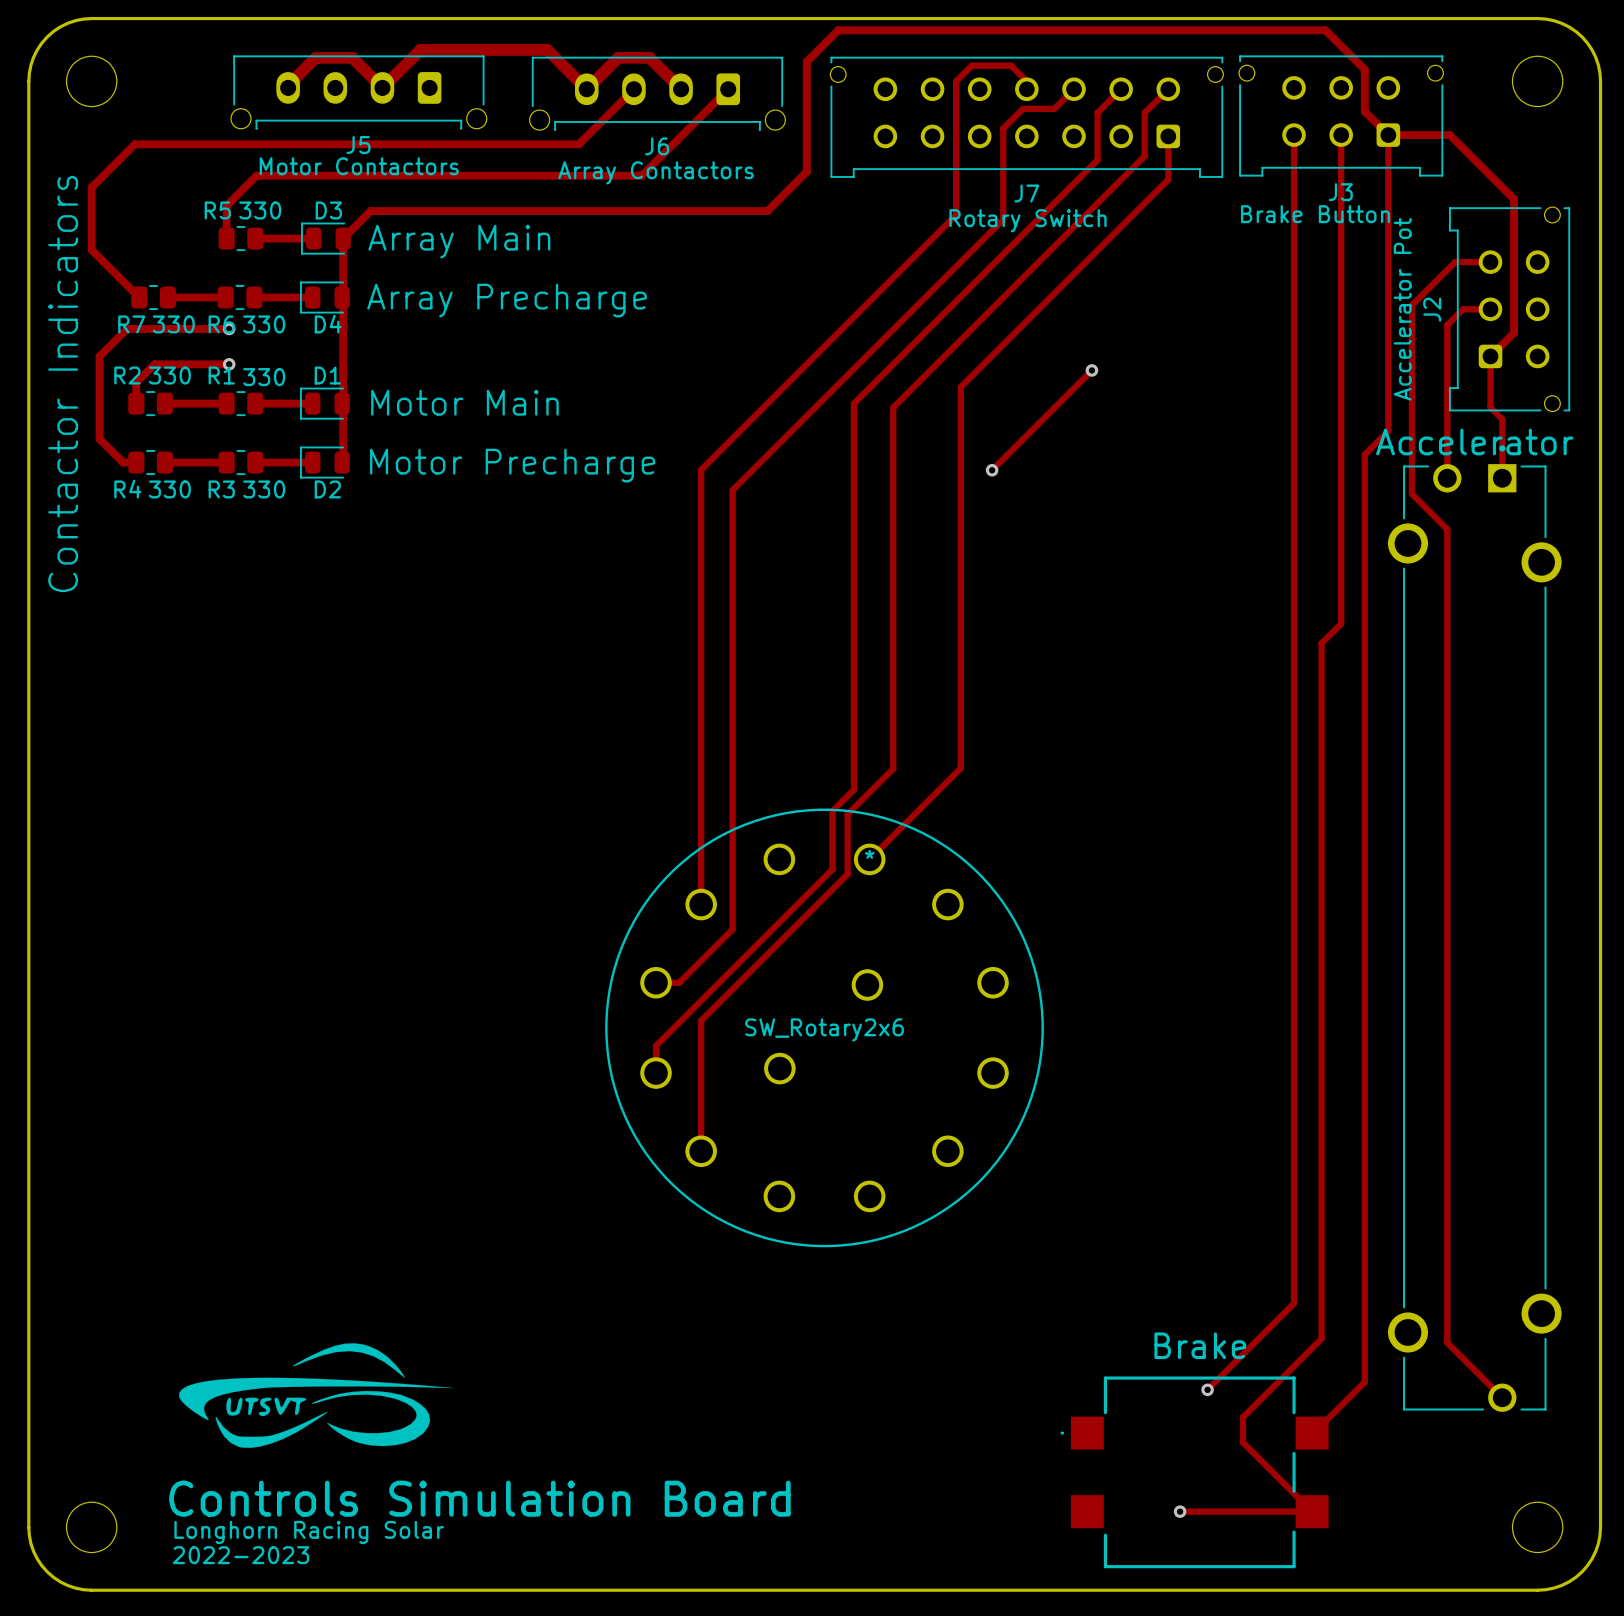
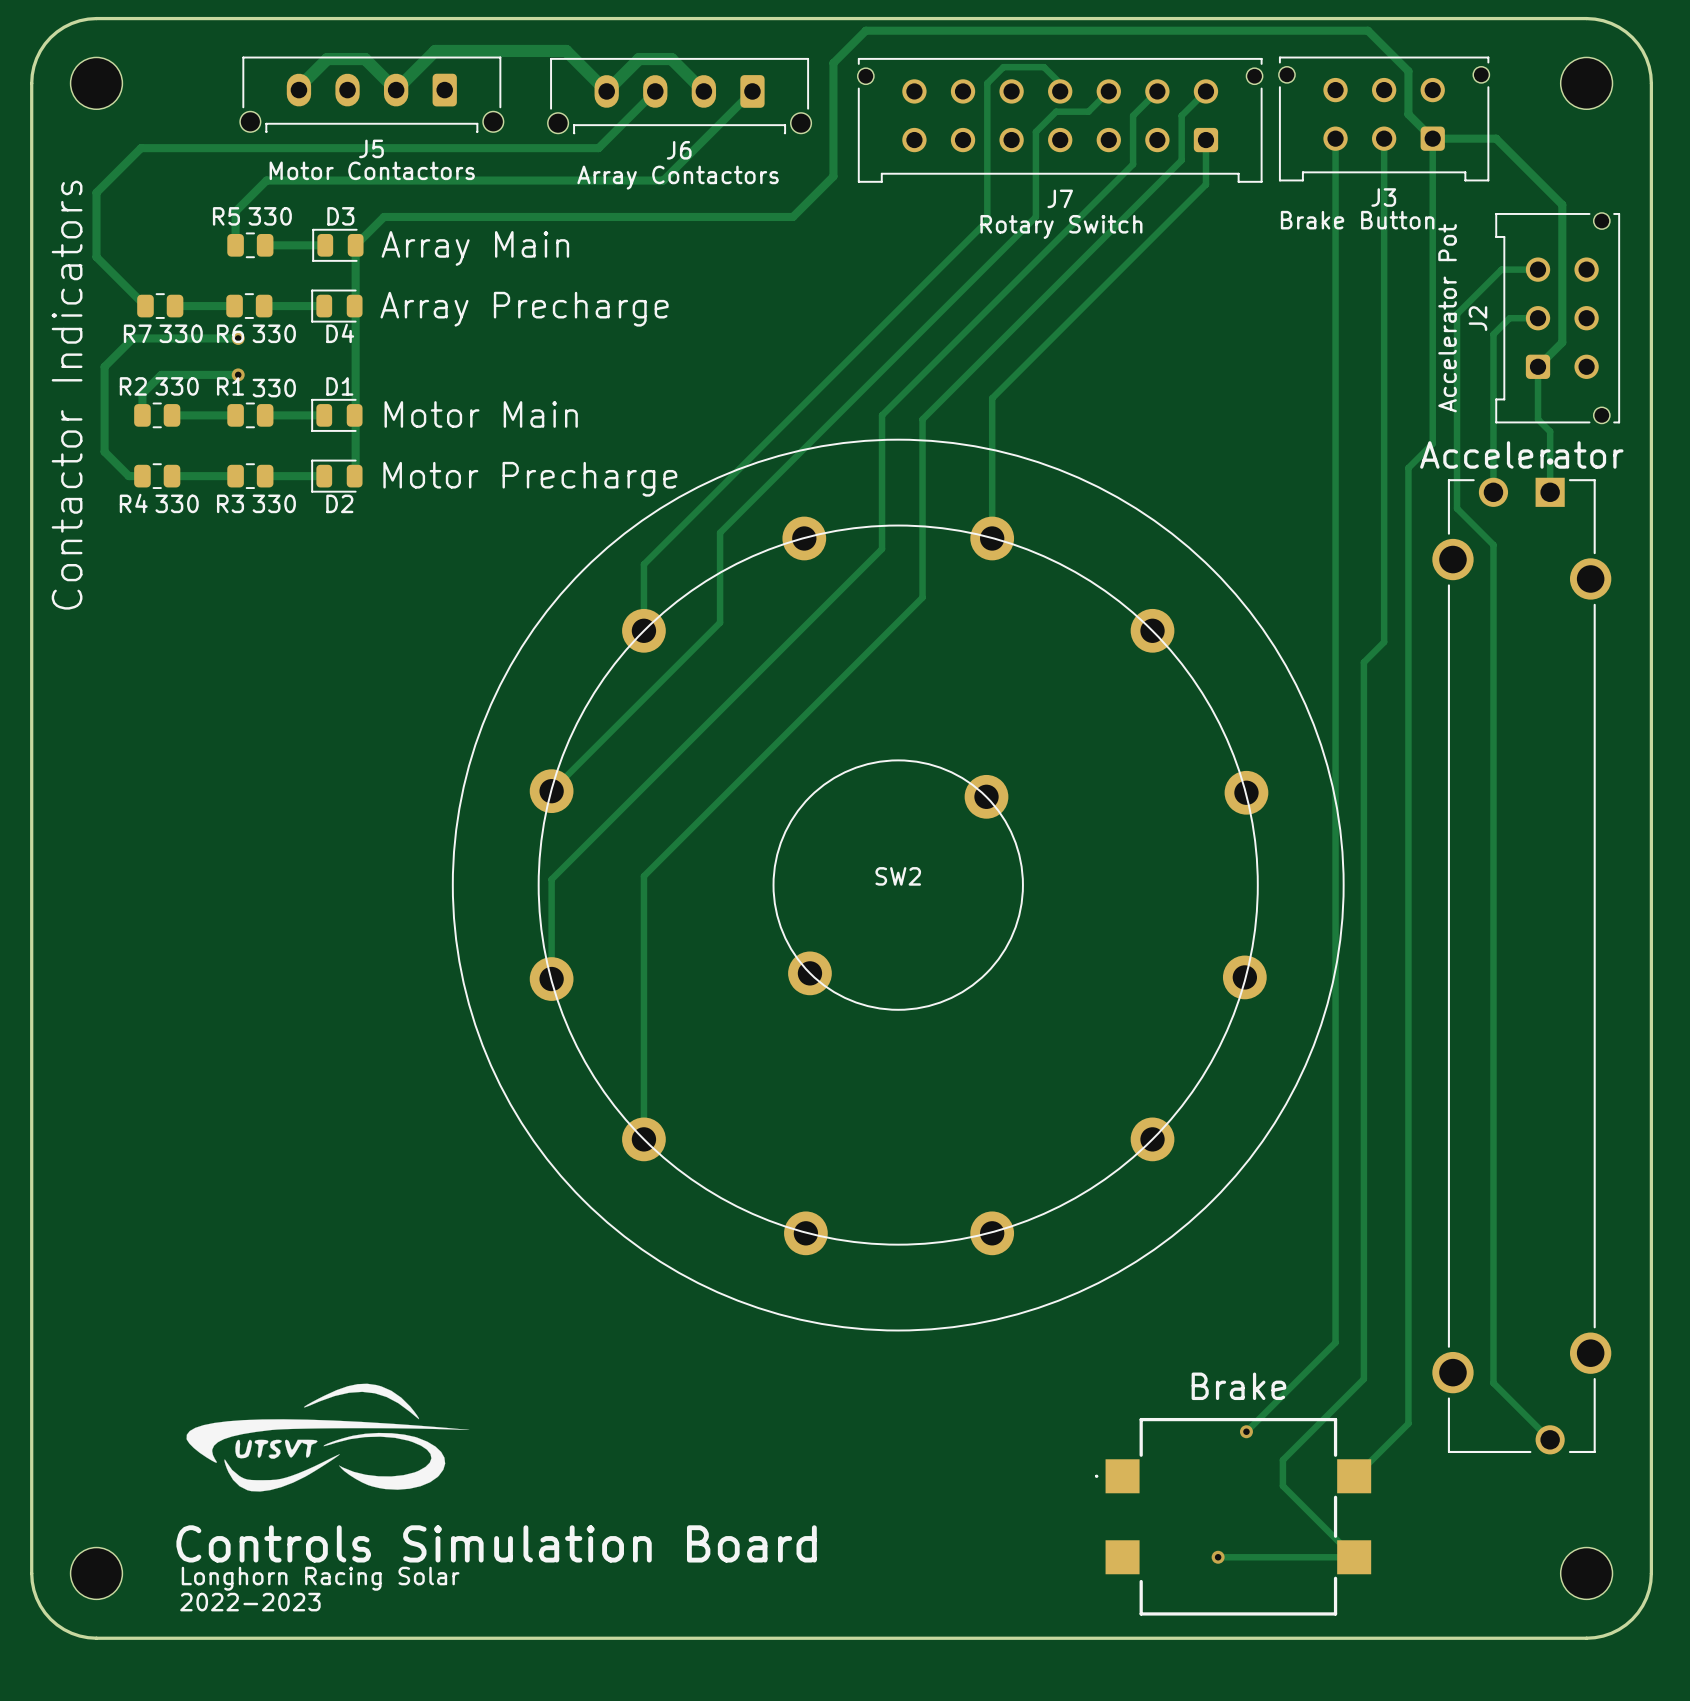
track: (1003, 211) (1003, 219) (732, 490) (732, 929) (679, 982) (656, 982) -> (1035, 216) (720, 532) (720, 622) (551, 791)
track: (1091, 370) (992, 470) -> none
via: (1091, 370) -> none
track: (701, 469) (701, 904) -> (724, 483) (643, 564) (643, 630)
via: (992, 470) -> none
track: (960, 523) (960, 768) (869, 859) -> none
track: (853, 533) (853, 789) (832, 811) (832, 869) (656, 1045) (656, 1073) -> (882, 549) (551, 879) (551, 979)
track: (893, 580) (893, 768) (847, 814) (847, 874) (701, 1020) (701, 1151) -> (922, 597) (643, 876) (643, 1139)
SW2: none -> (898, 885)
part: SW_Rotary2x6 (824, 1027) -> none

